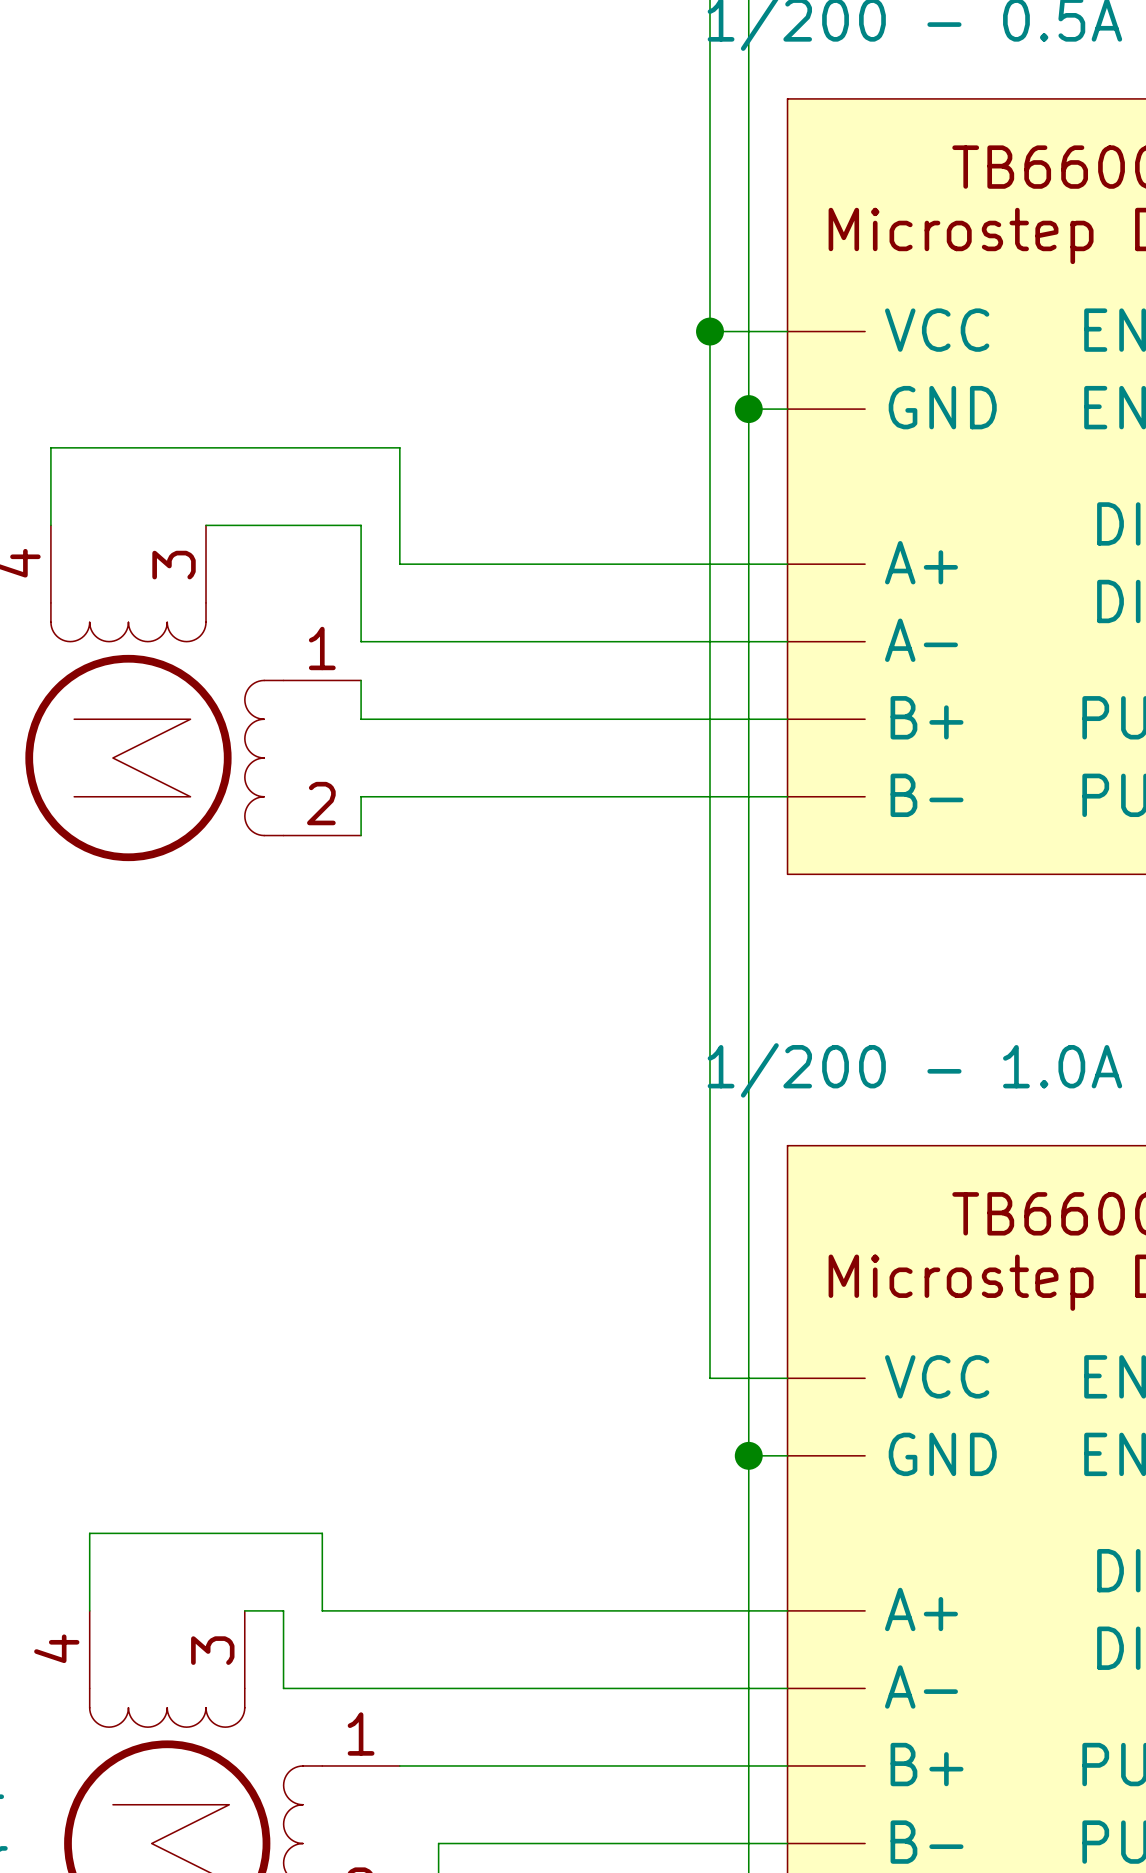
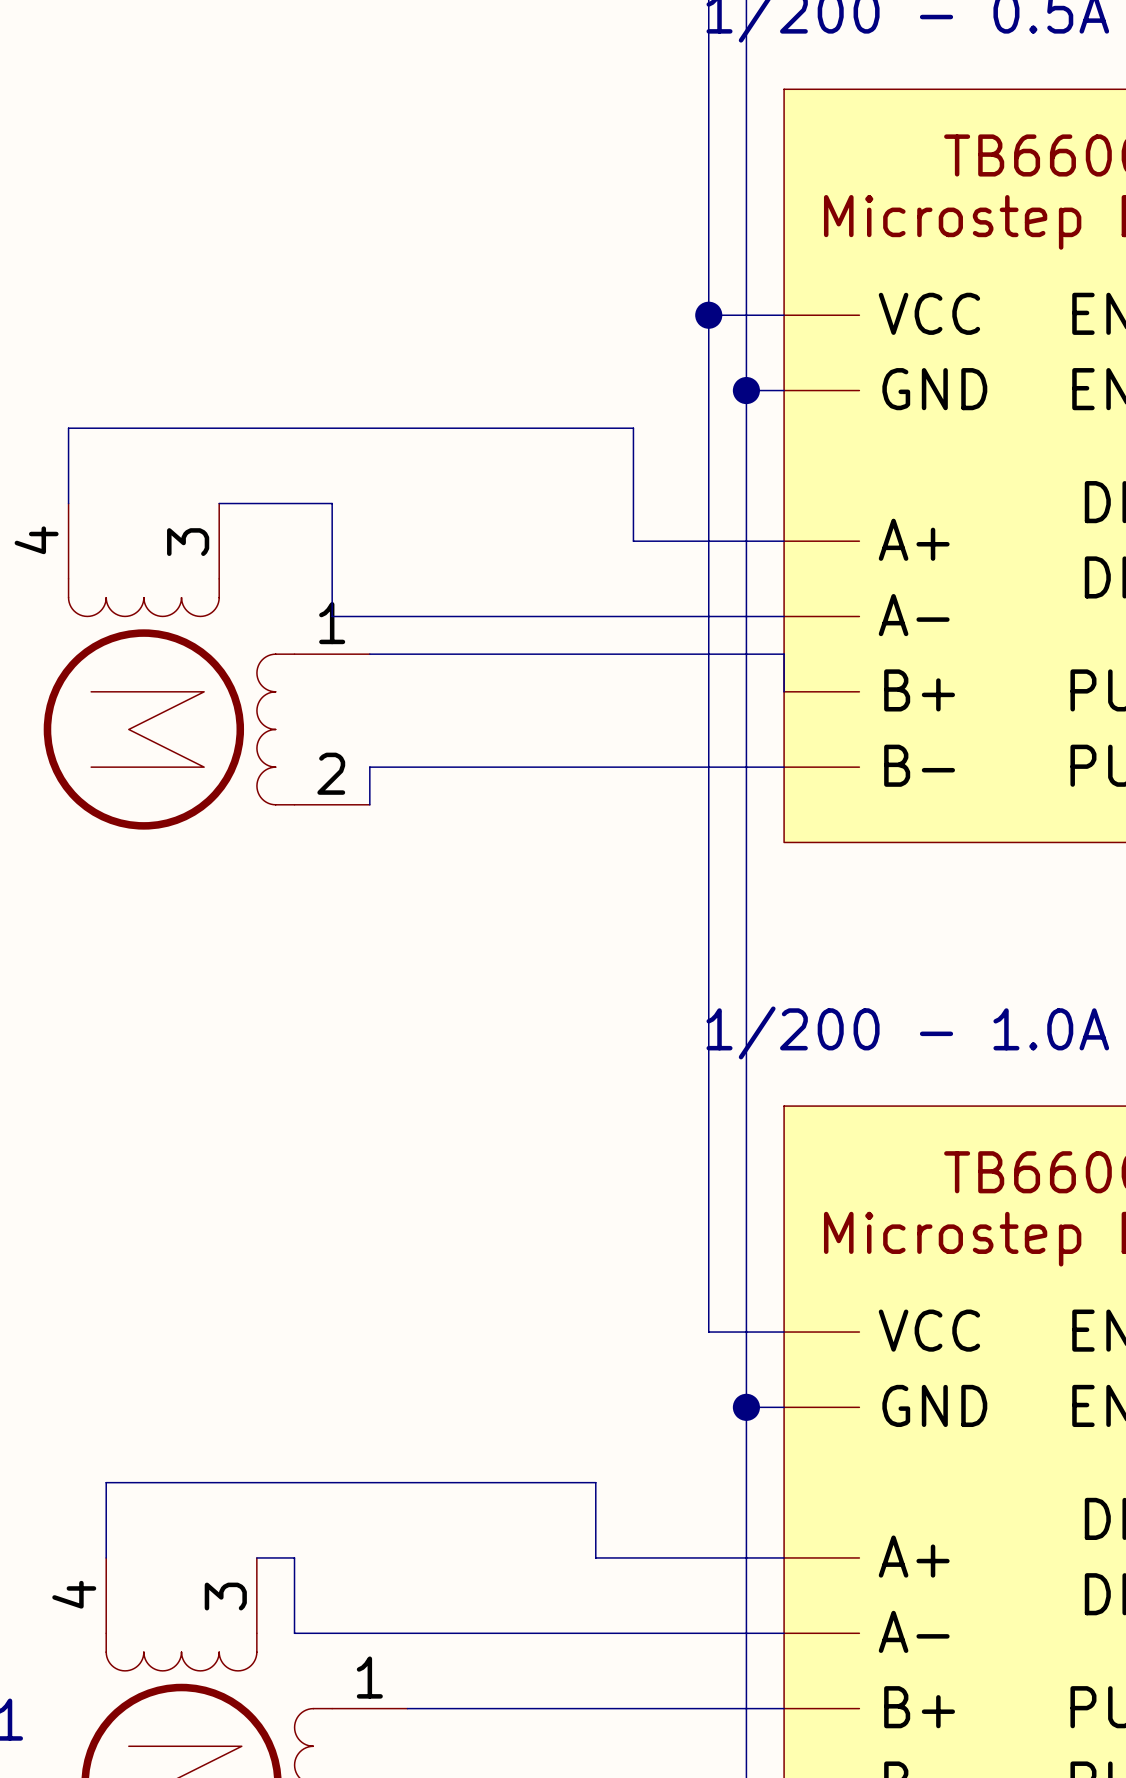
wire: (399, 447) (399, 564) (632, 564) -> (407, 428) (633, 428) (633, 541)
wire: (322, 525) (361, 525) (361, 641) -> (332, 503) (332, 616) (369, 616)
wire: (361, 680) (361, 719) (787, 719) -> (369, 654) (784, 654) (784, 691)
wire: (322, 1533) (322, 1610) (593, 1610) -> (332, 1482) (595, 1482) (595, 1557)

